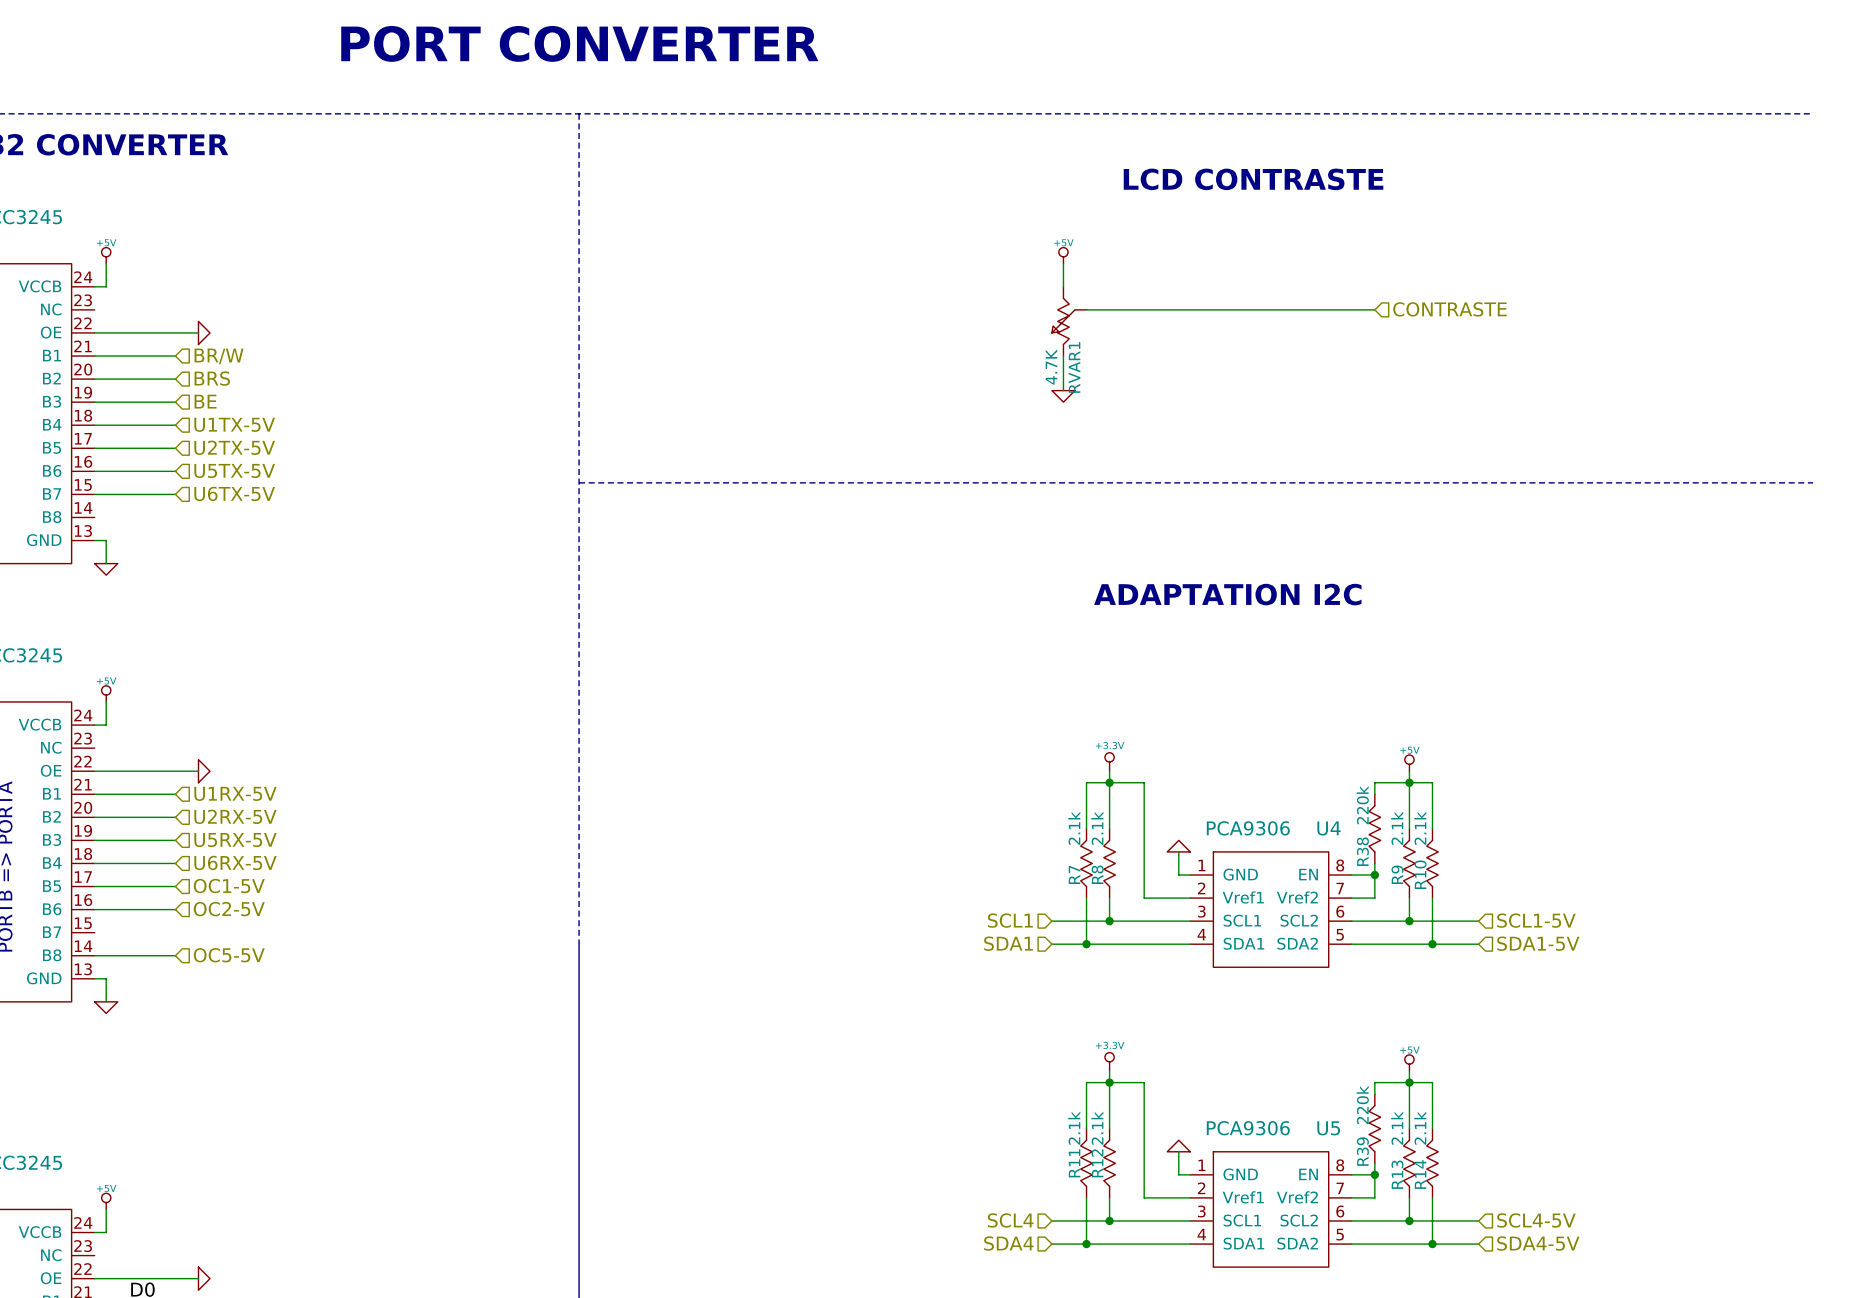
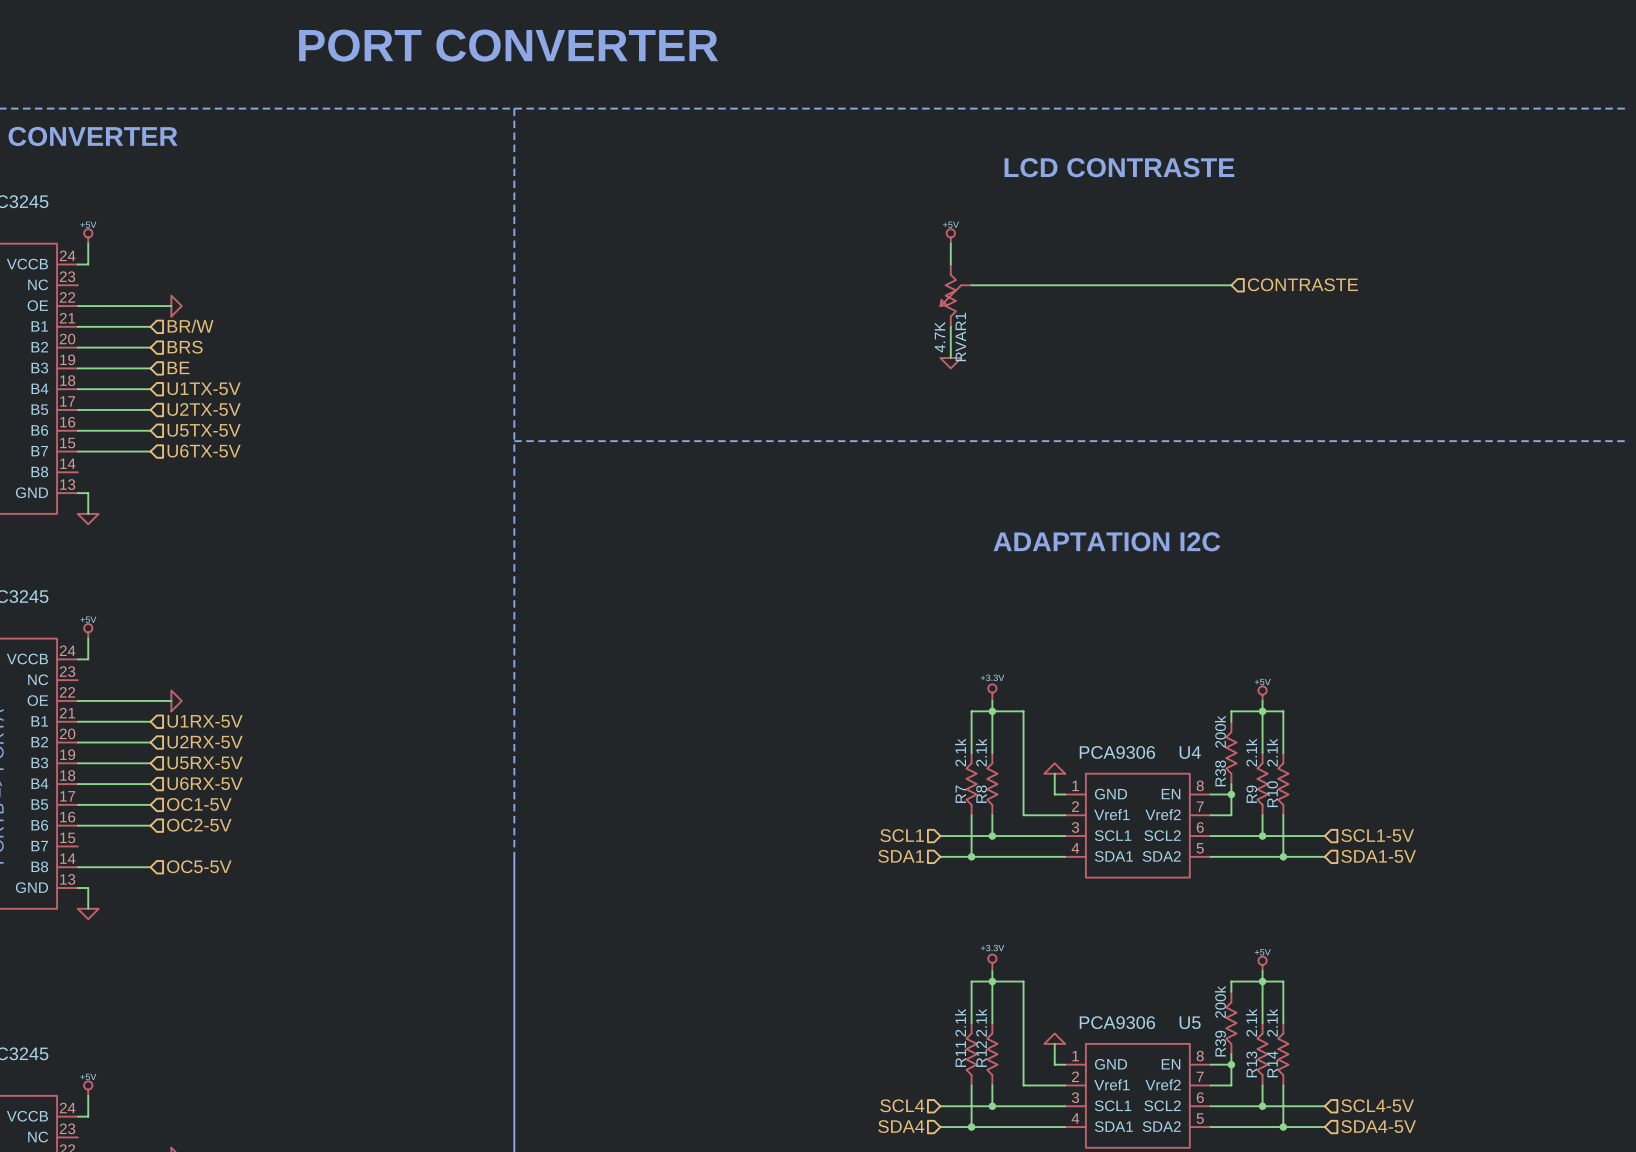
R38 value: 220k (1362, 805) -> 200k (1220, 731)
R39 value: 220k (1362, 1105) -> 200k (1220, 1001)

